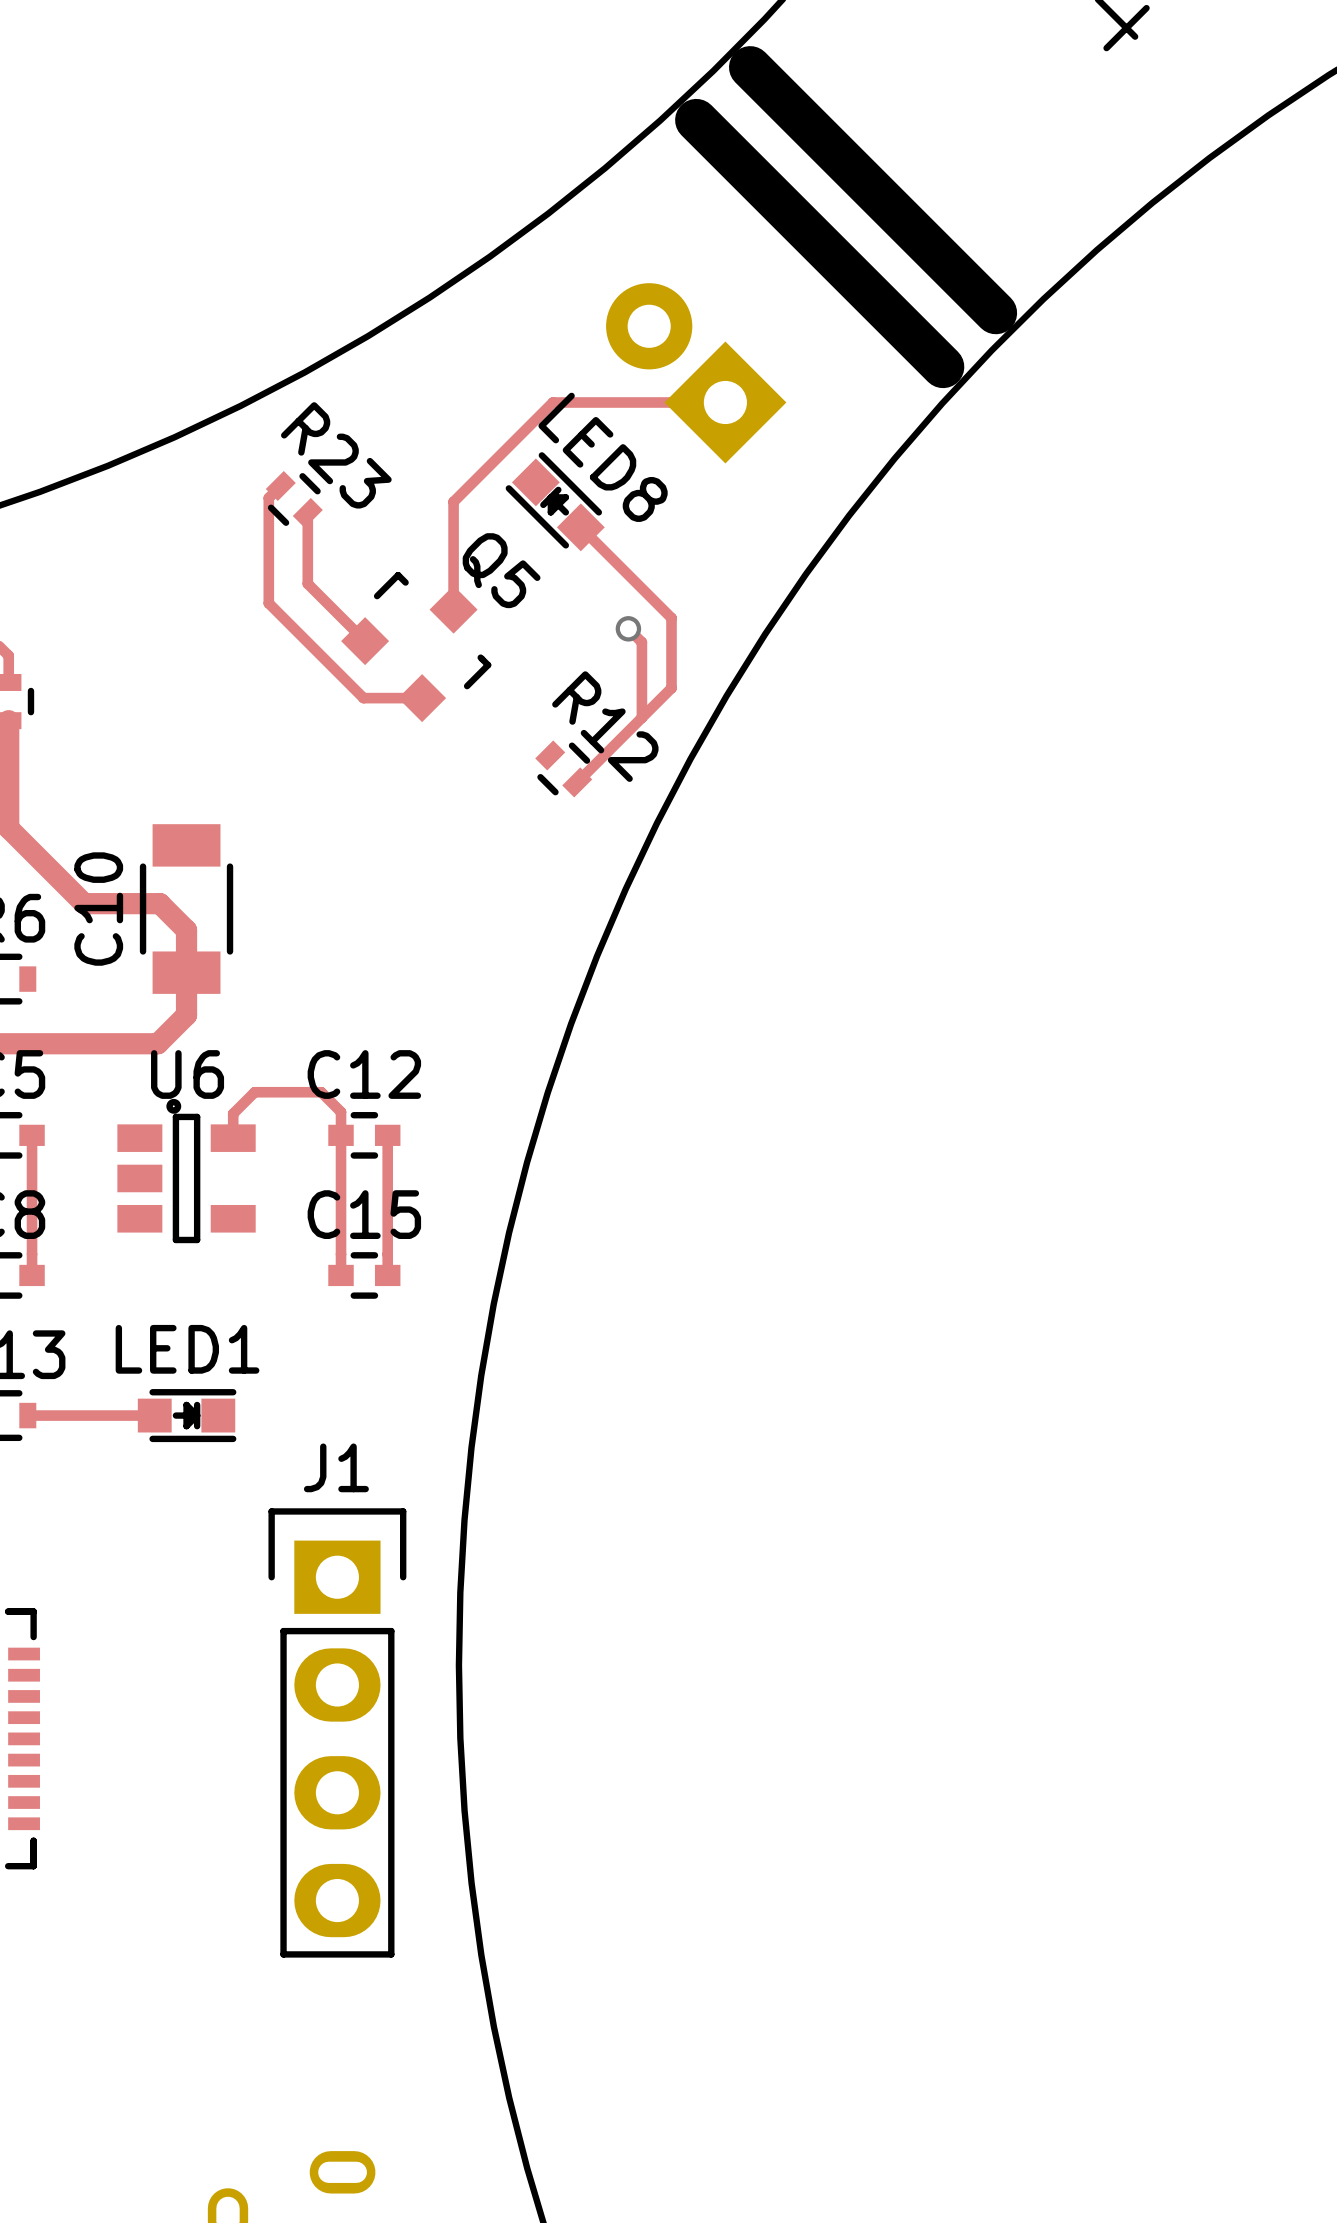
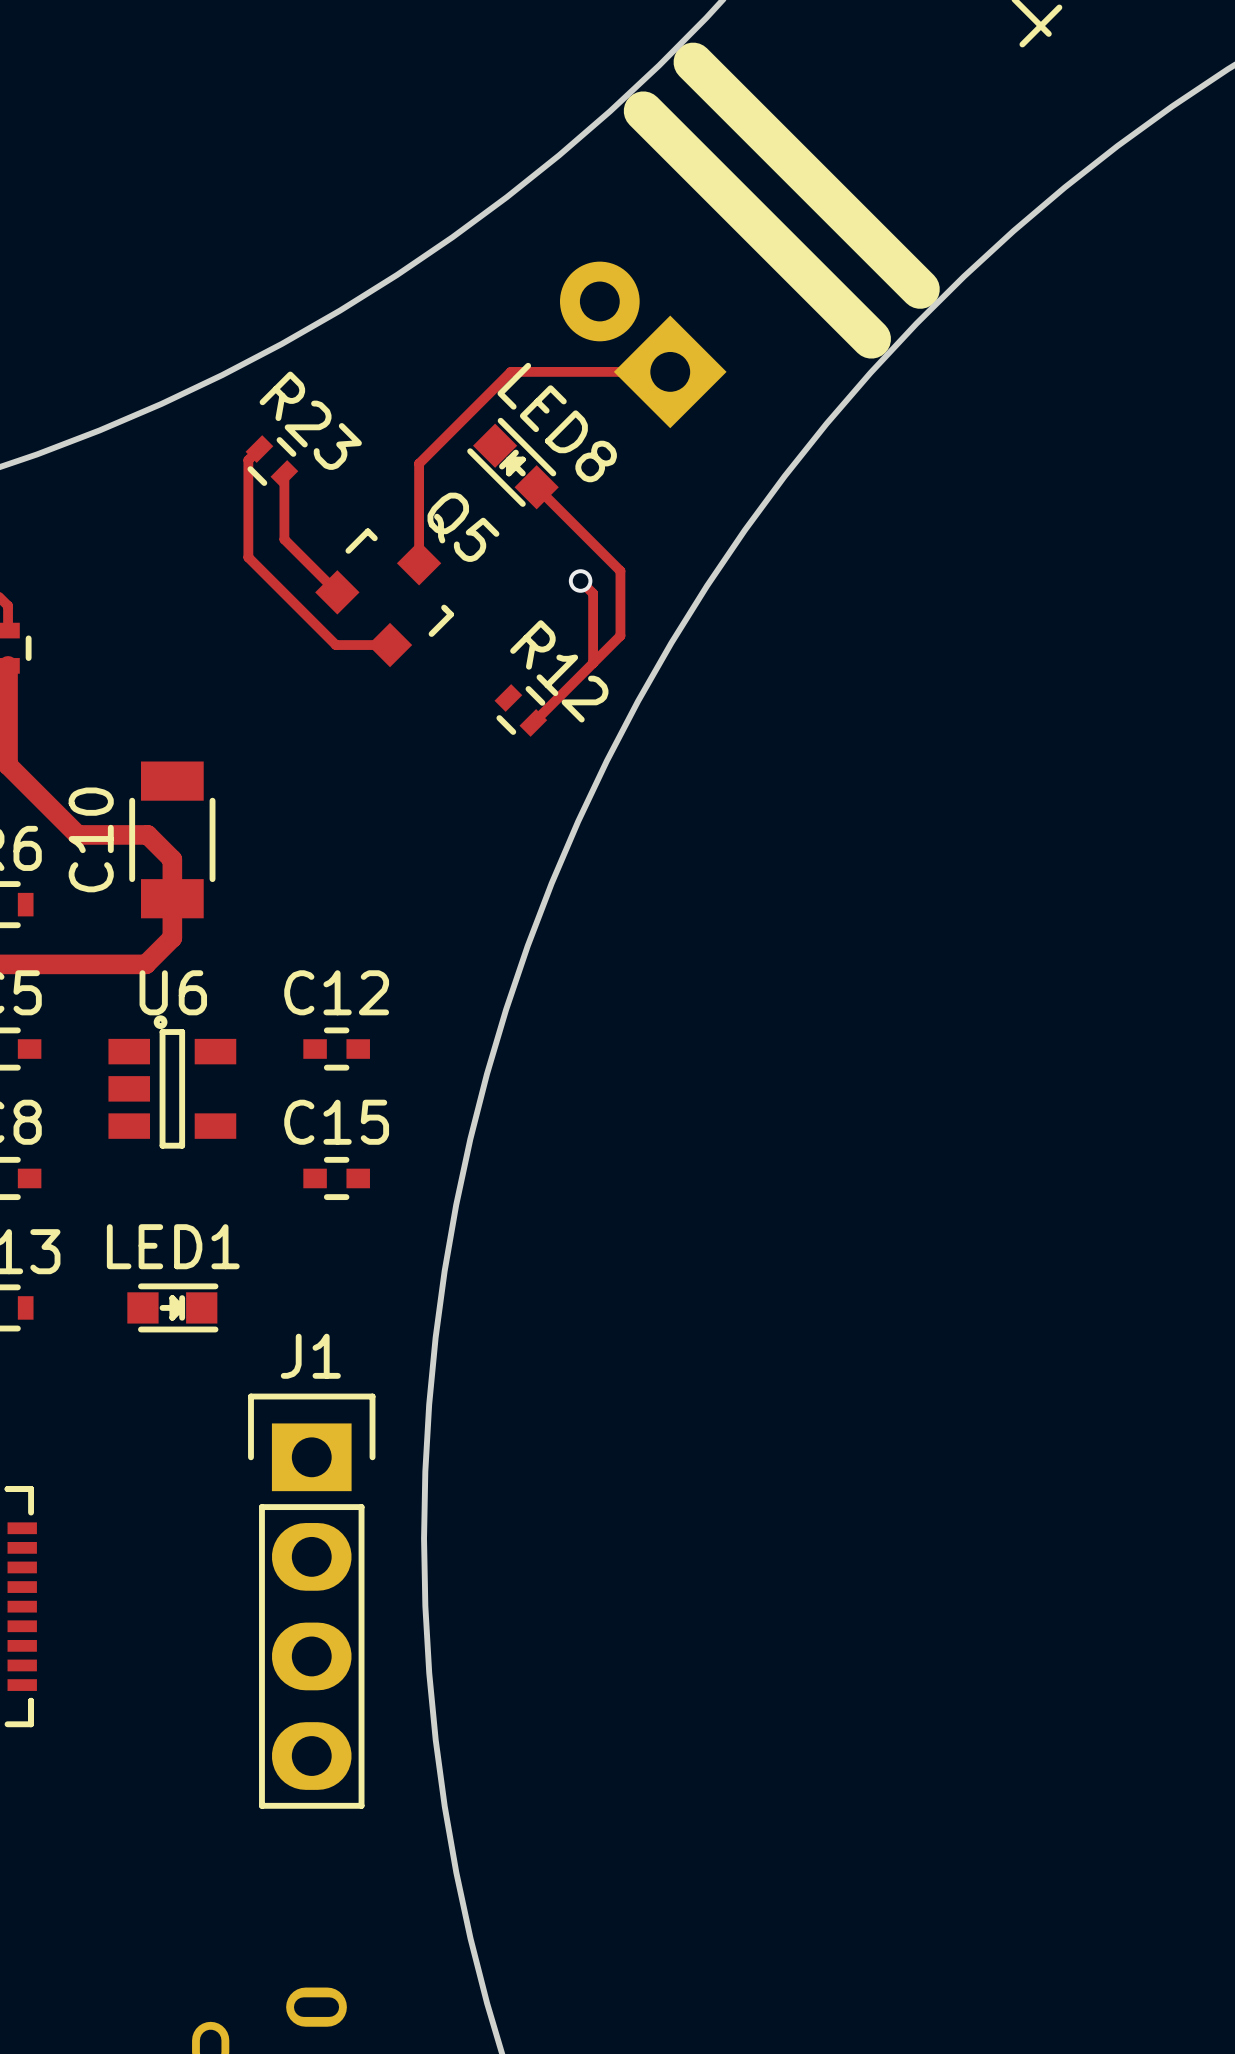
track: (32, 1135) (32, 1275) -> none
track: (387, 1135) (387, 1275) -> none
track: (233, 1138) (233, 1113) (254, 1092) (321, 1092) (341, 1112) (341, 1275) -> none
track: (27, 1415) (154, 1415) -> none

